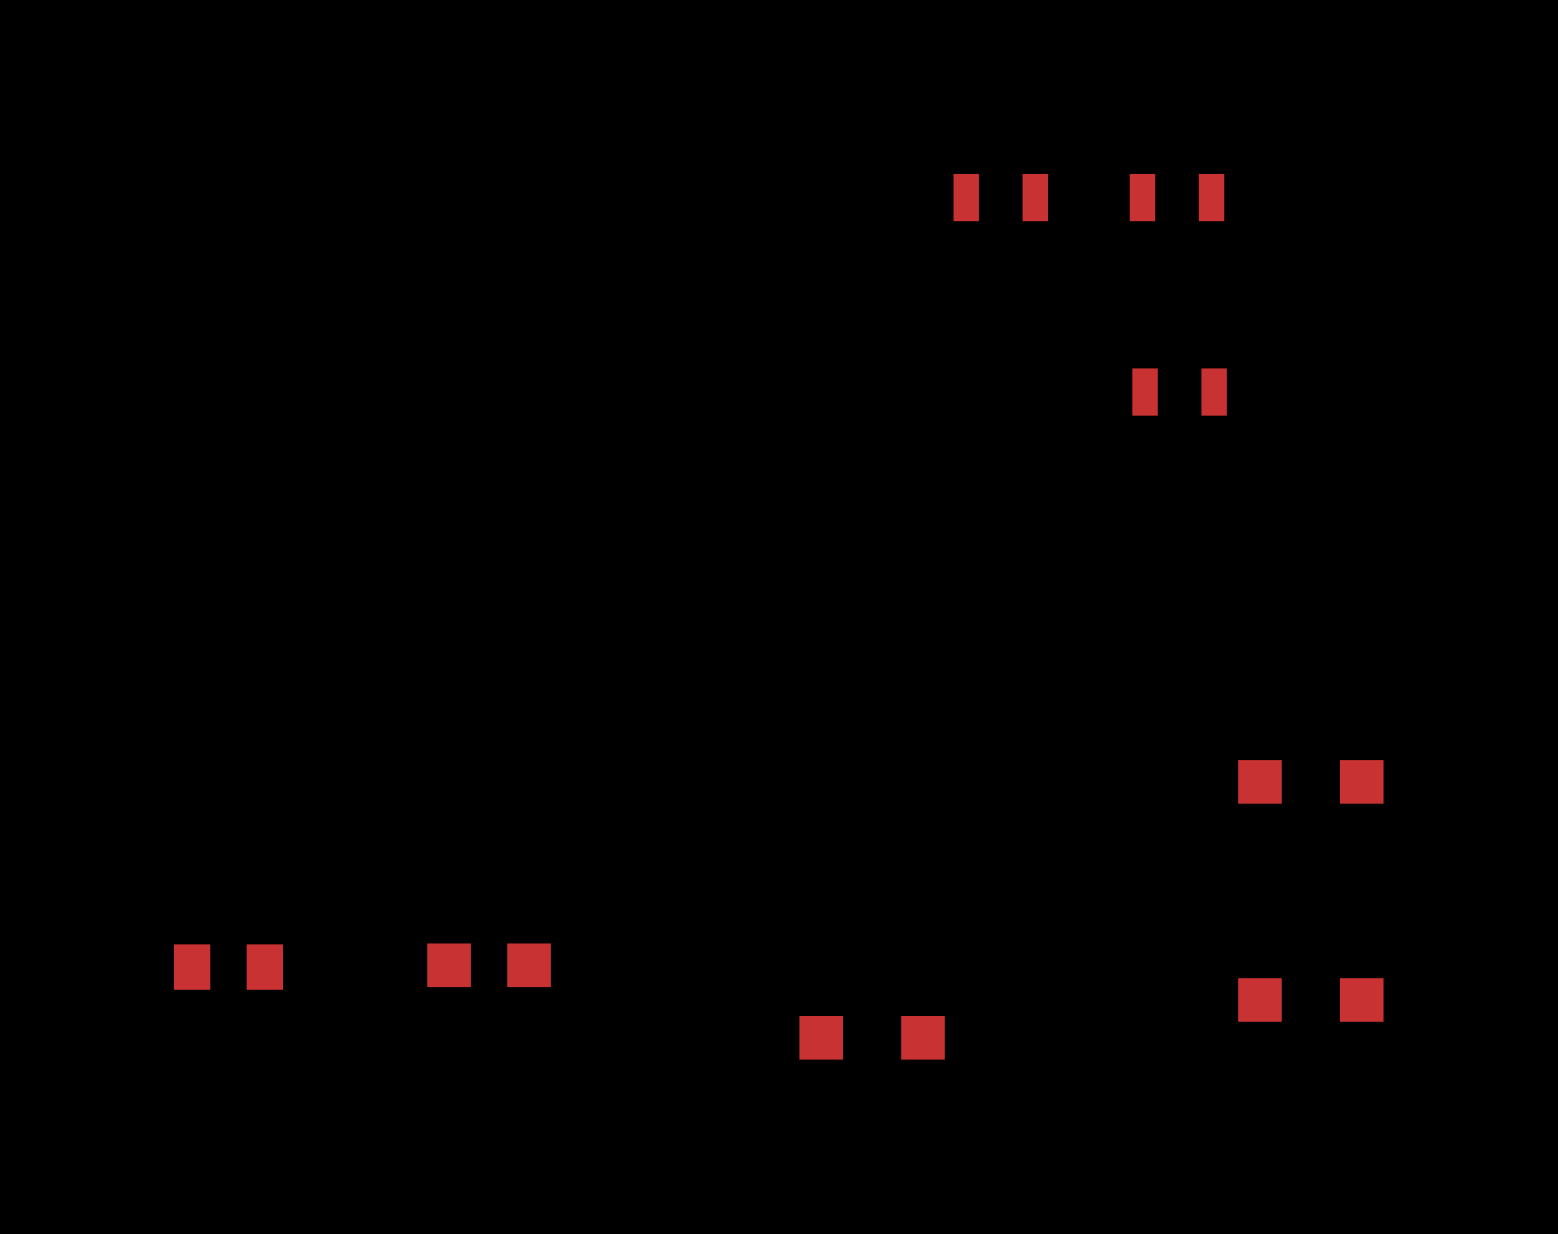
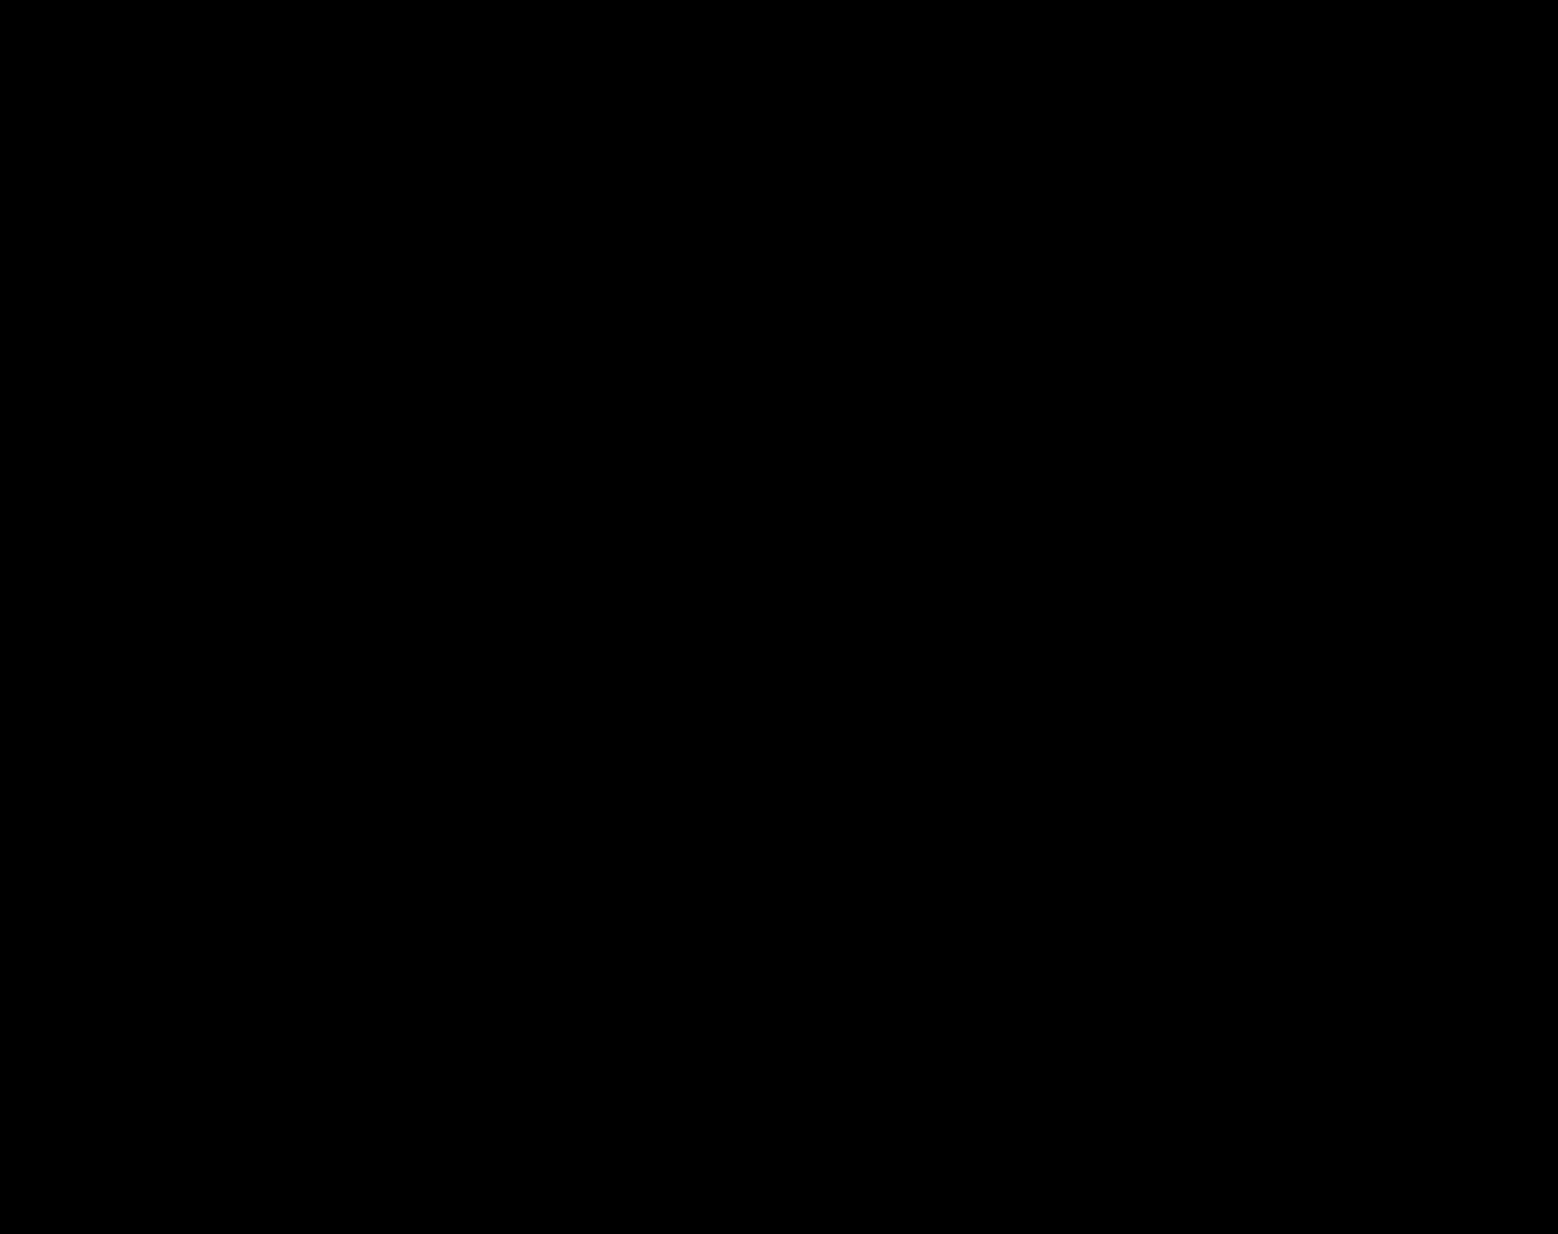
part: (1000, 197) -> none
part: (1177, 197) -> none
part: (1179, 392) -> none
part: (1310, 781) -> none
part: (489, 965) -> none
part: (228, 967) -> none
part: (1310, 999) -> none
part: (872, 1037) -> none

